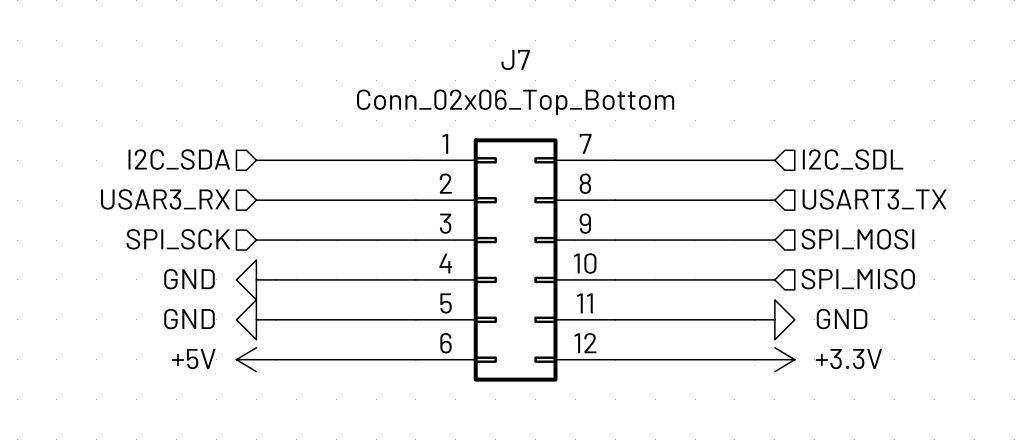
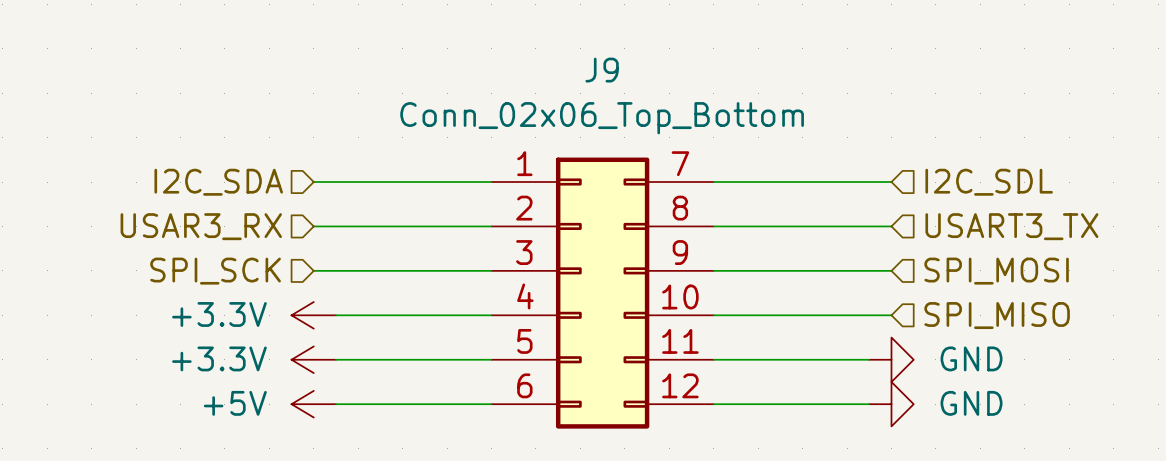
J7 name: J7 (515, 59) -> J9 (602, 70)
power symbol: GND (256, 279) -> +3.3V (313, 315)
power symbol: GND (256, 319) -> +3.3V (313, 359)
power symbol: +3.3V (774, 359) -> GND (891, 404)

